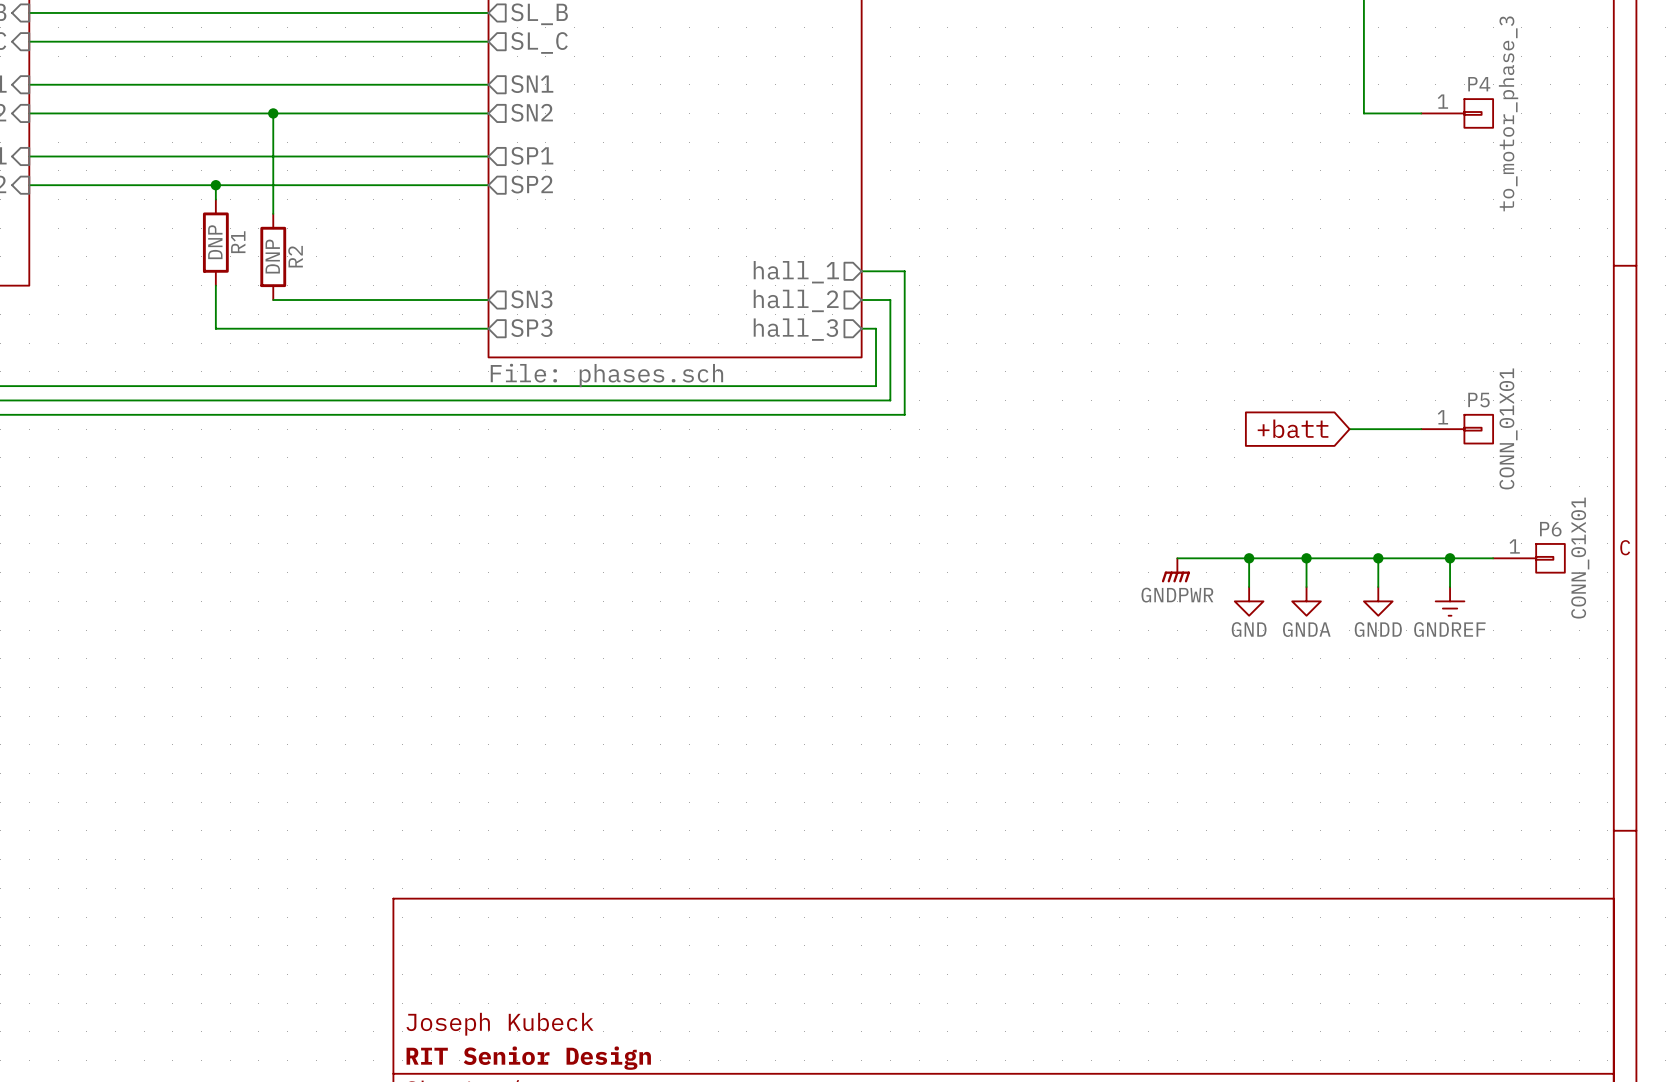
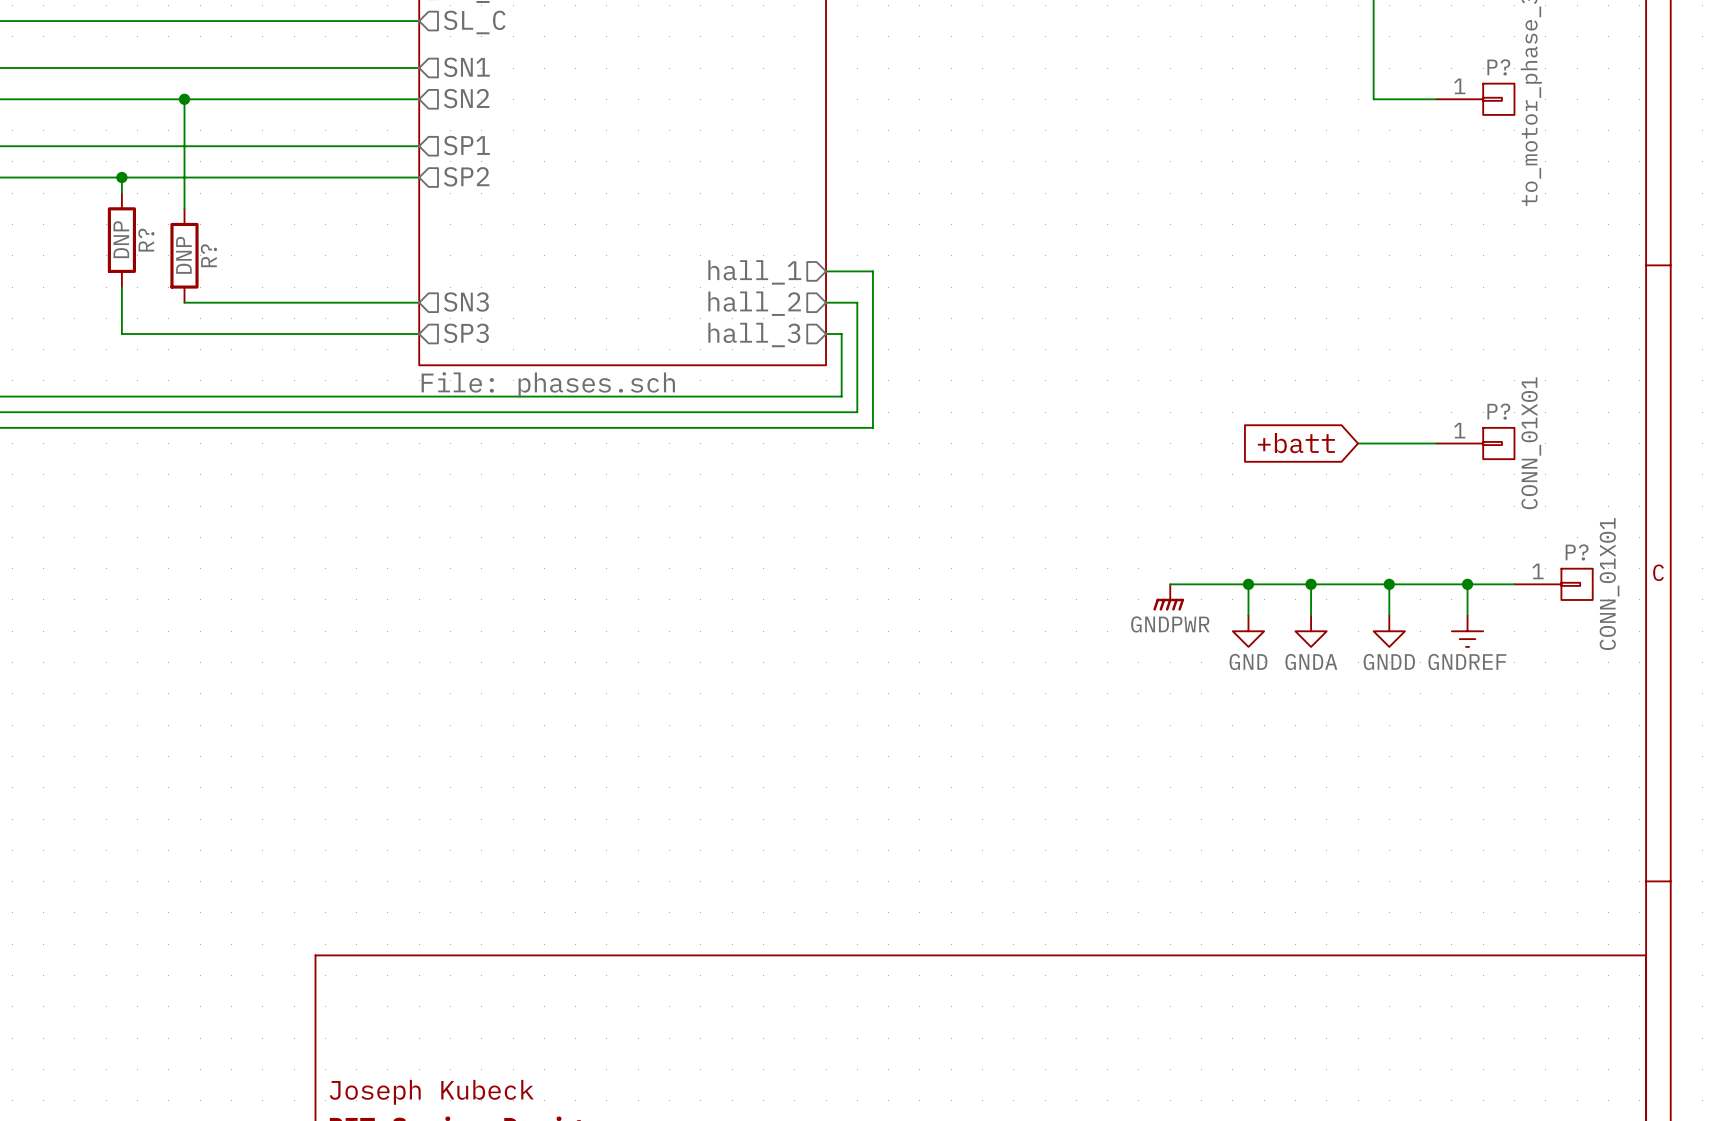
P4 name: P4 (1479, 84) -> P? (1498, 67)
R1 name: R1 (238, 242) -> R? (146, 240)
R2 name: R2 (295, 256) -> R? (208, 255)
P5 name: P5 (1478, 400) -> P? (1498, 411)
P6 name: P6 (1550, 529) -> P? (1577, 552)

